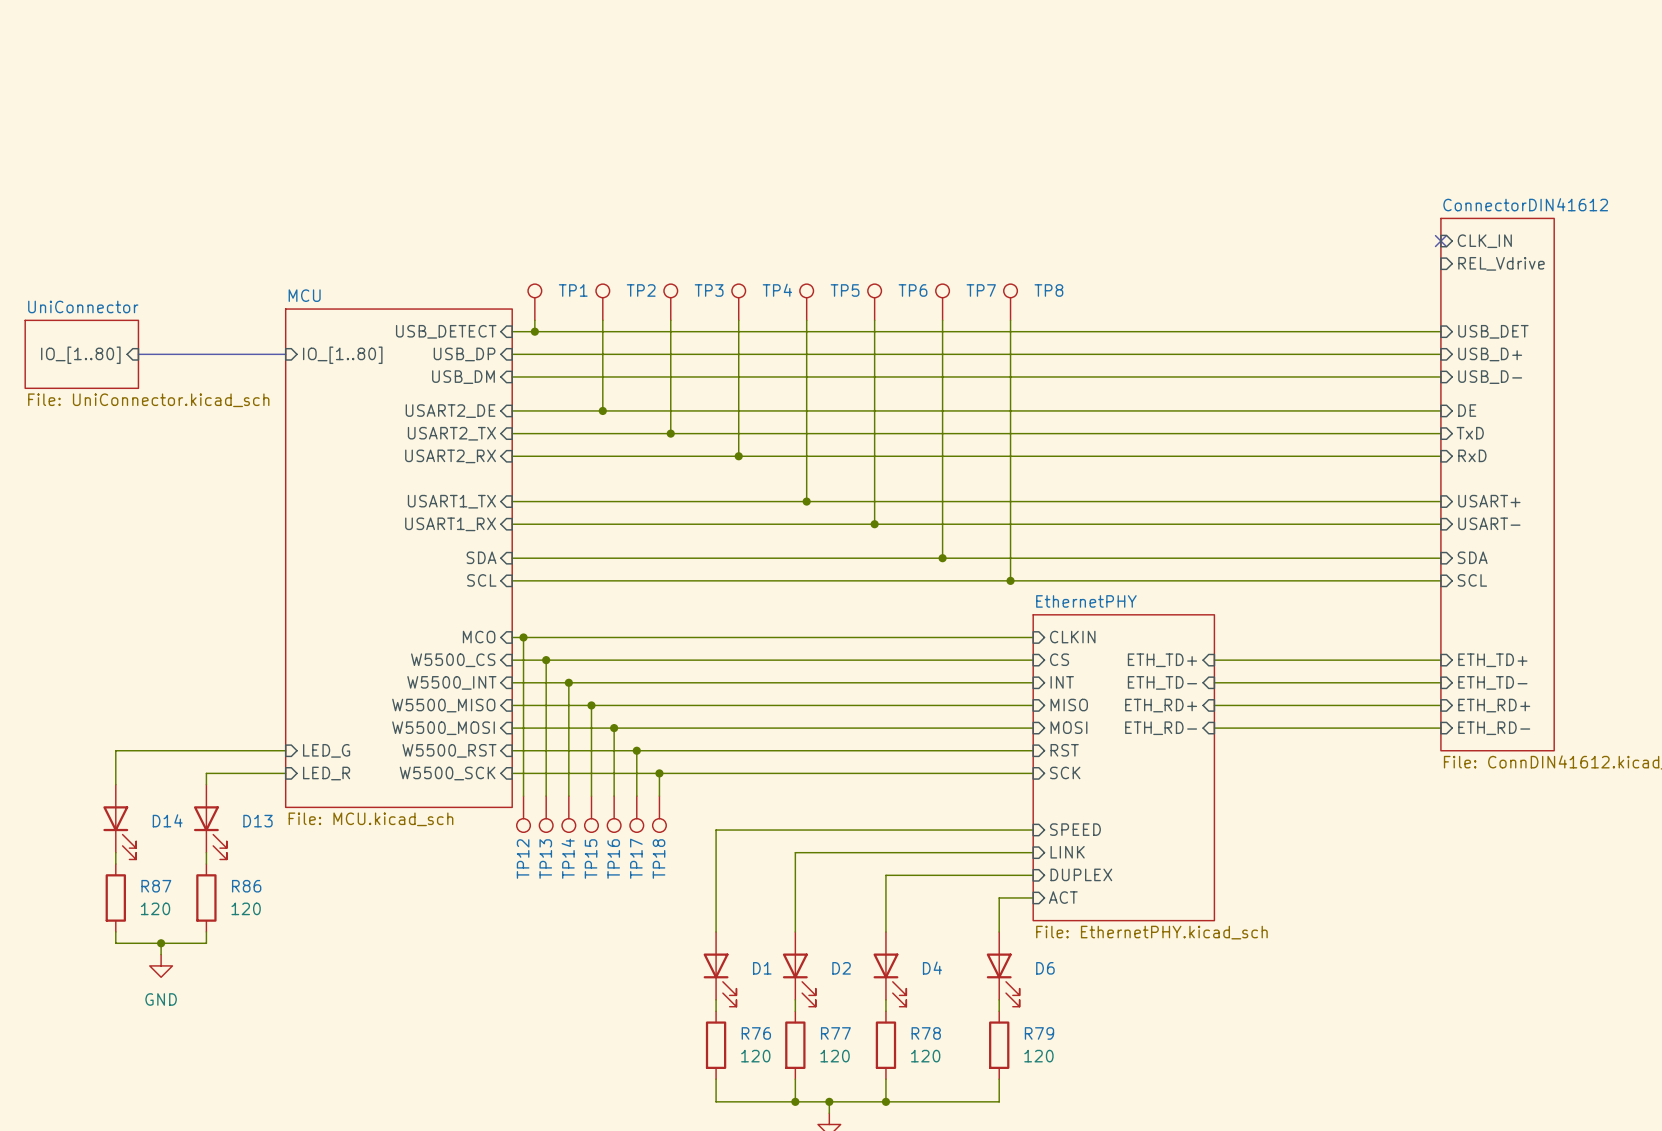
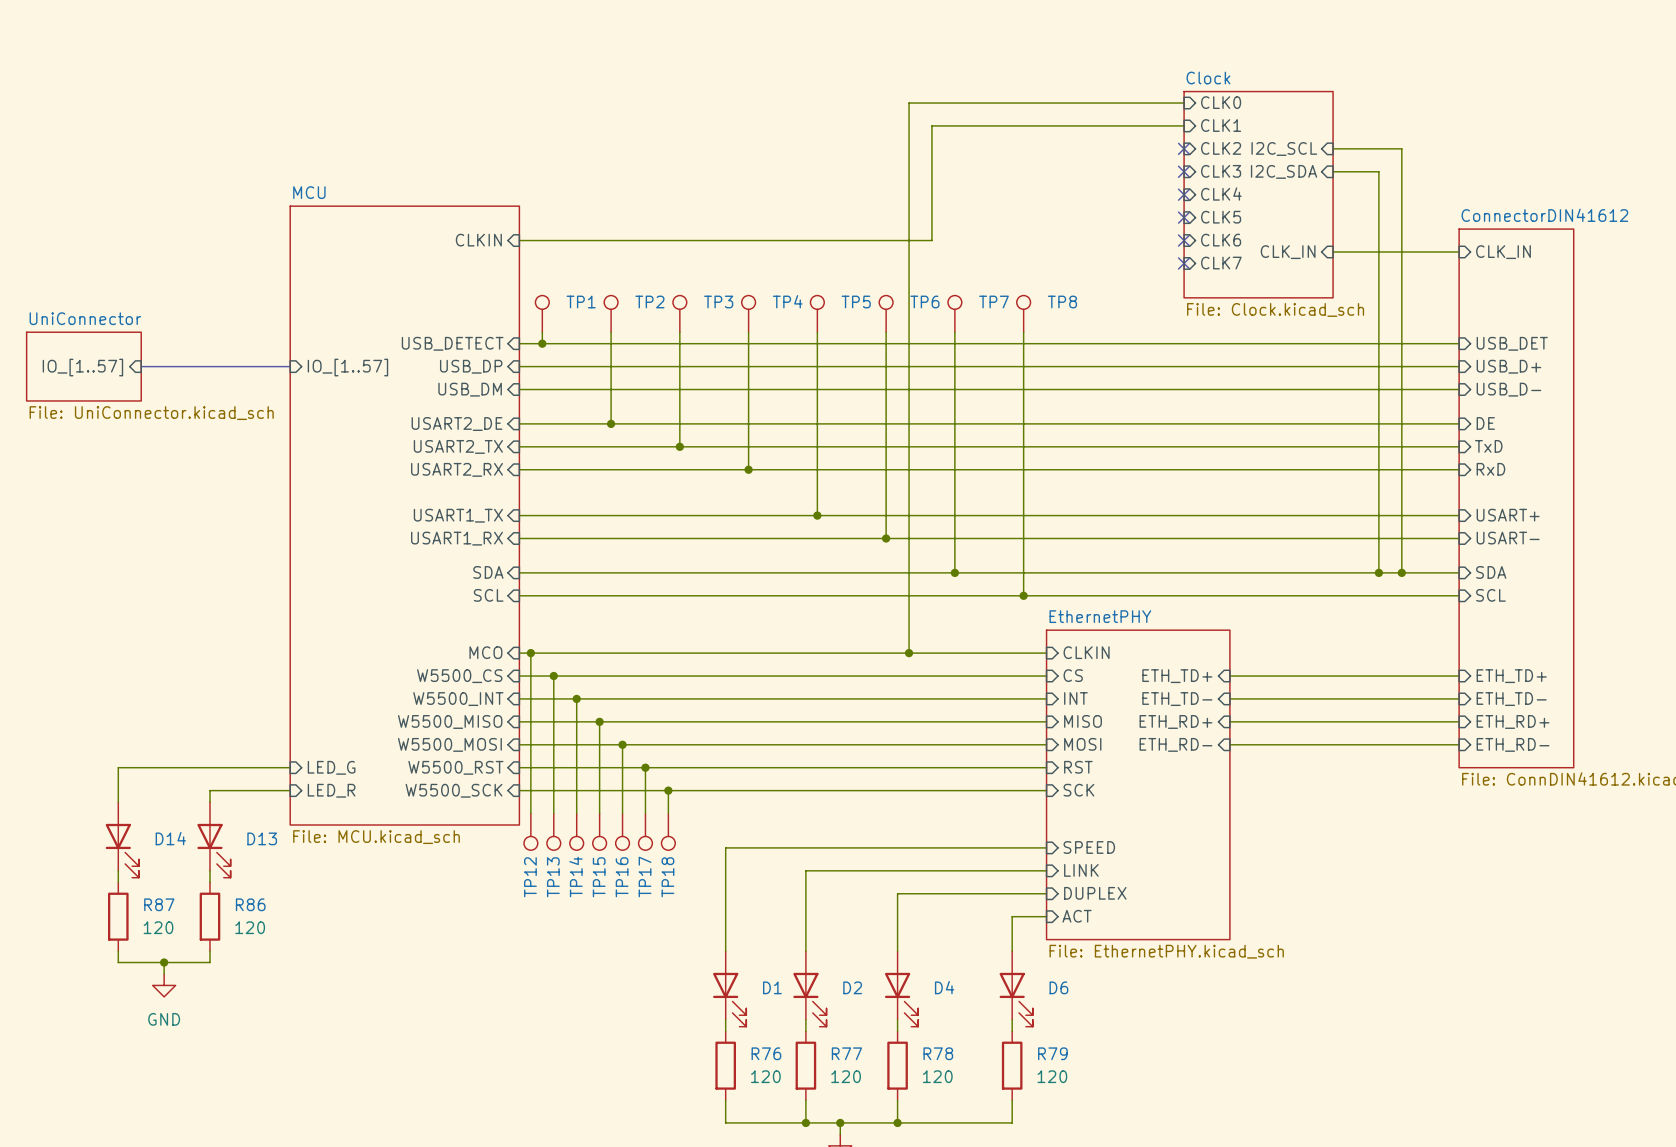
wire: none -> (1184, 103) (909, 103) (909, 653)
sheet pin: none -> CLK0 (1221, 102)
wire: none -> (1184, 125) (931, 125) (931, 240) (519, 240)
sheet pin: none -> CLK1 (1221, 125)
sheet pin: none -> CLK2 (1221, 148)
no-connect mark: none -> (1184, 148)
sheet pin: none -> I2C_SCL (1284, 148)
wire: none -> (1333, 148) (1401, 148) (1401, 572)
no-connect mark: none -> (1184, 171)
sheet pin: none -> CLK3 (1221, 171)
sheet pin: none -> I2C_SDA (1284, 171)
wire: none -> (1333, 171) (1378, 171) (1378, 572)
sheet pin: none -> CLK4 (1221, 194)
no-connect mark: none -> (1184, 194)
sheet Clock: none -> File: Clock.kicad_sch (1258, 194)
sheet pin: none -> CLK5 (1221, 217)
no-connect mark: none -> (1184, 217)
sheet pin: none -> CLKIN (478, 240)
no-connect mark: none -> (1184, 240)
sheet pin: none -> CLK6 (1221, 240)
sheet pin: none -> CLK_IN (1288, 252)
wire: none -> (1333, 252) (1459, 252)
no-connect mark: (1440, 241) -> none
sheet pin: none -> CLK7 (1221, 263)
no-connect mark: none -> (1184, 263)
sheet pin: REL_Vdrive (1501, 263) -> none
sheet pin: IO_[1..80] (80, 355) -> IO_[1..57] (82, 367)
sheet pin: IO_[1..80] (342, 355) -> IO_[1..57] (347, 367)
sheet MCU: none -> File: MCU.kicad_sch (404, 515)
sheet MCU: File: MCU.kicad_sch (398, 558) -> none
junction: none -> (1378, 572)
junction: none -> (1401, 572)
junction: none -> (909, 653)

